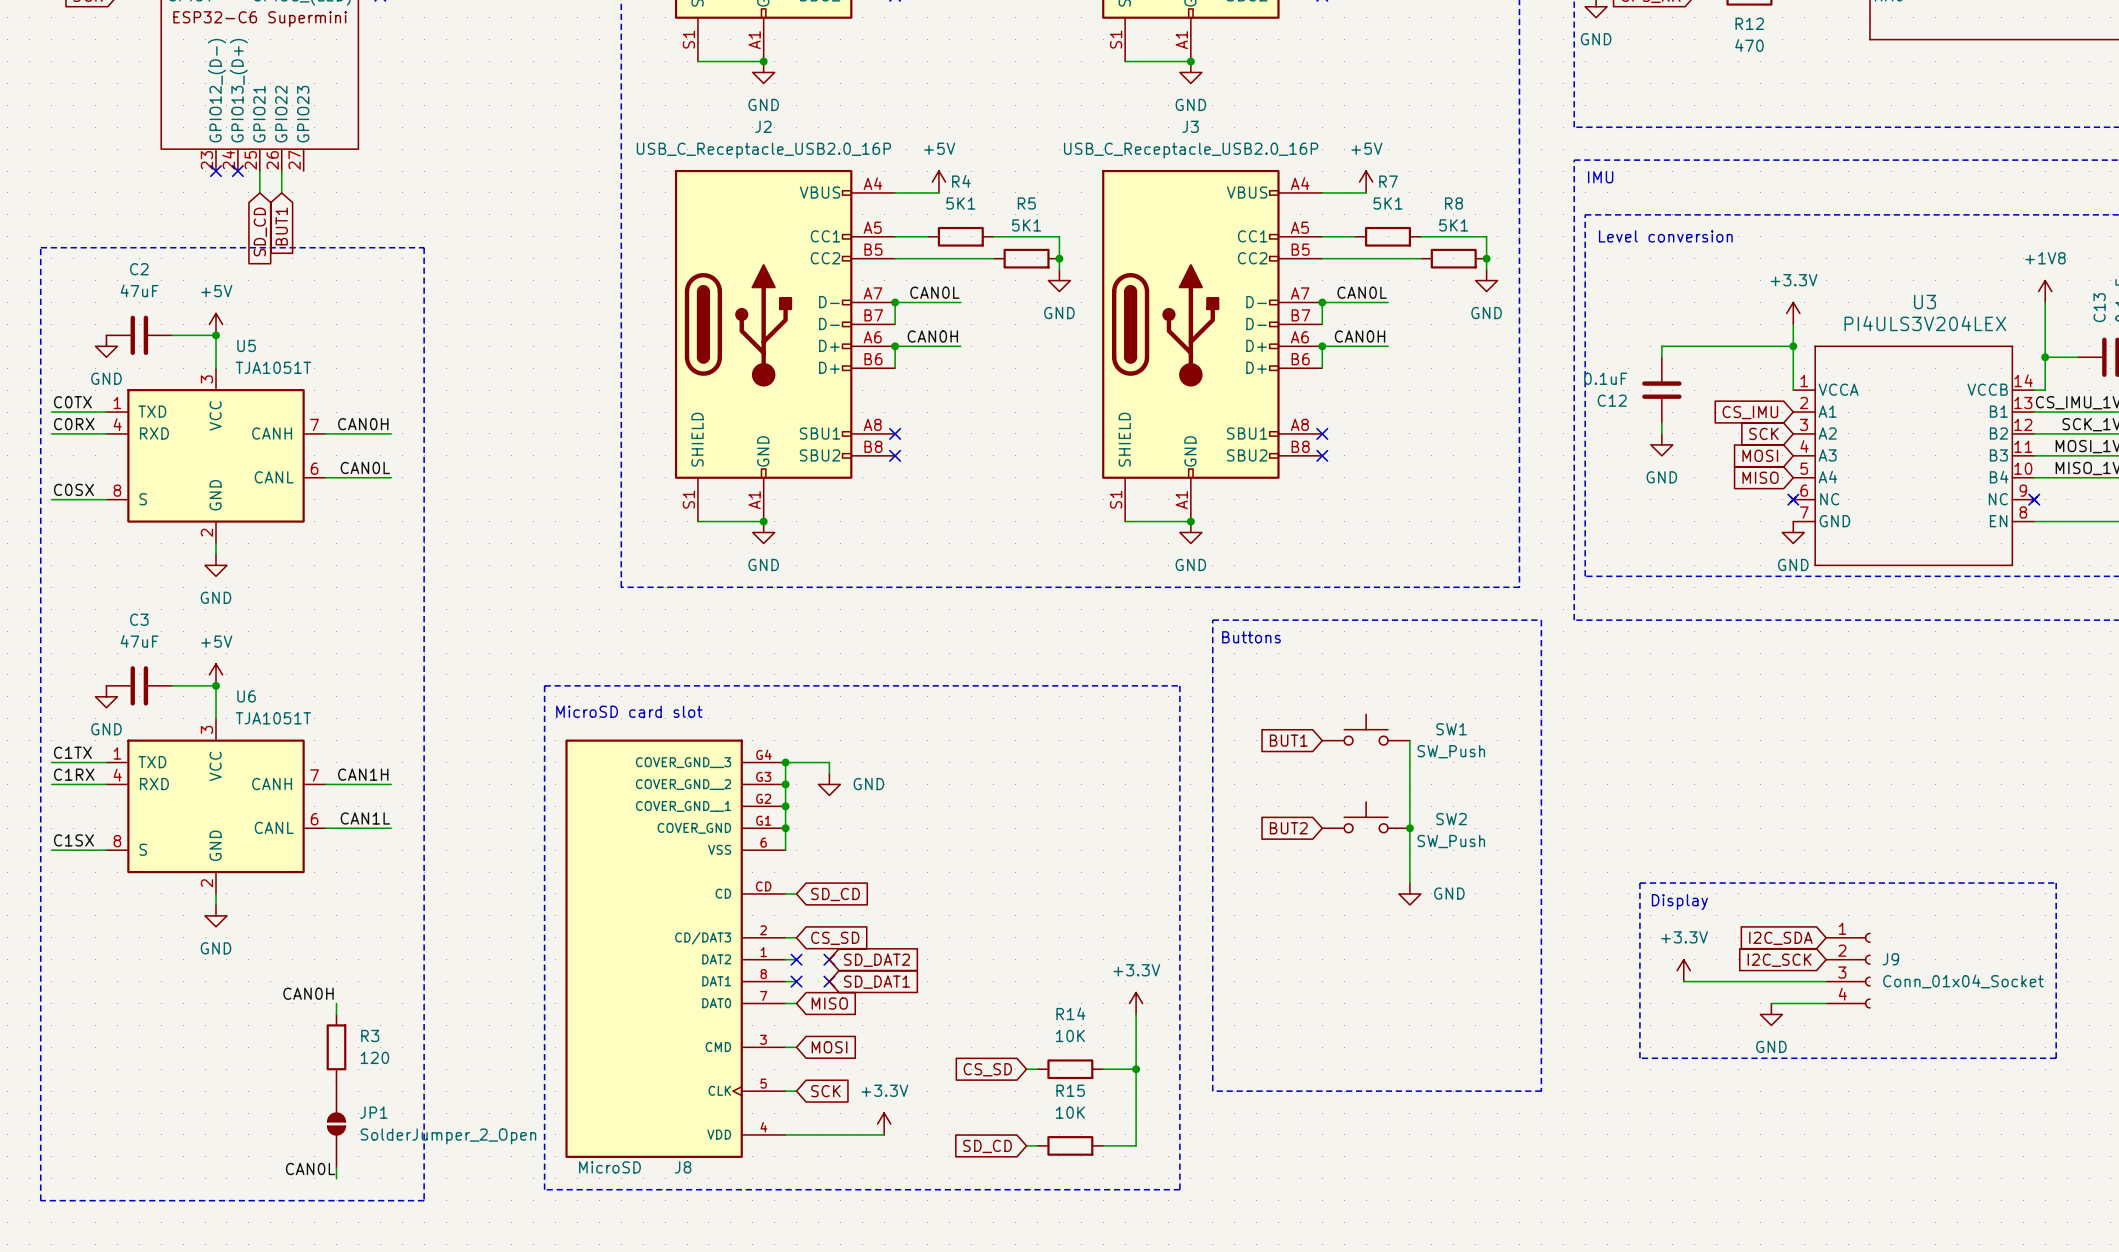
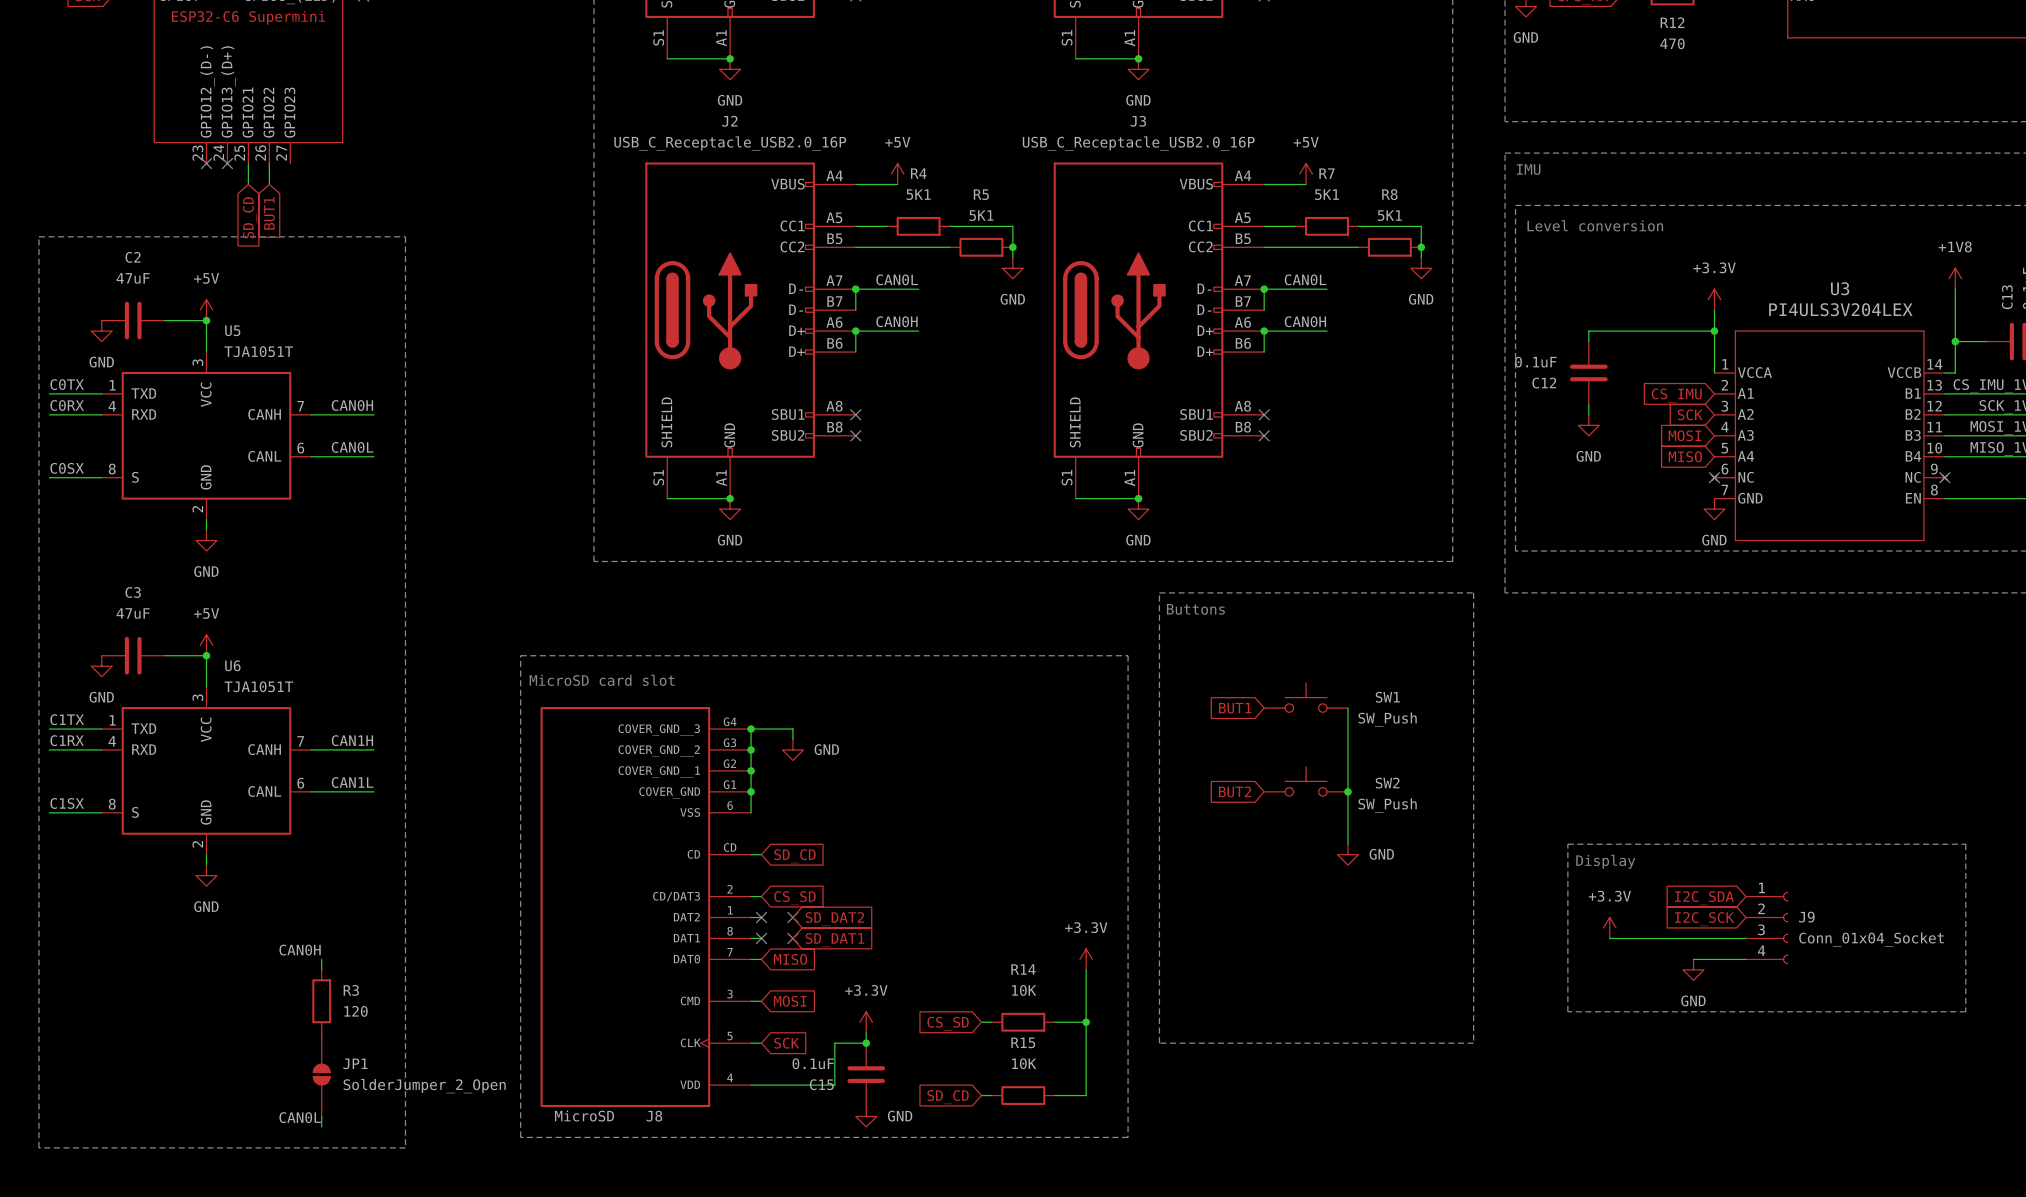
junction: none -> (866, 1043)
power symbol position: +3.3V (884, 1124) -> +3.3V (866, 1022)
C15: none -> 0.1uF (866, 1074)
wire: (873, 1134) (884, 1134) -> (834, 1085) (834, 1043) (866, 1043) (866, 1032)
power symbol: none -> GND (866, 1116)

